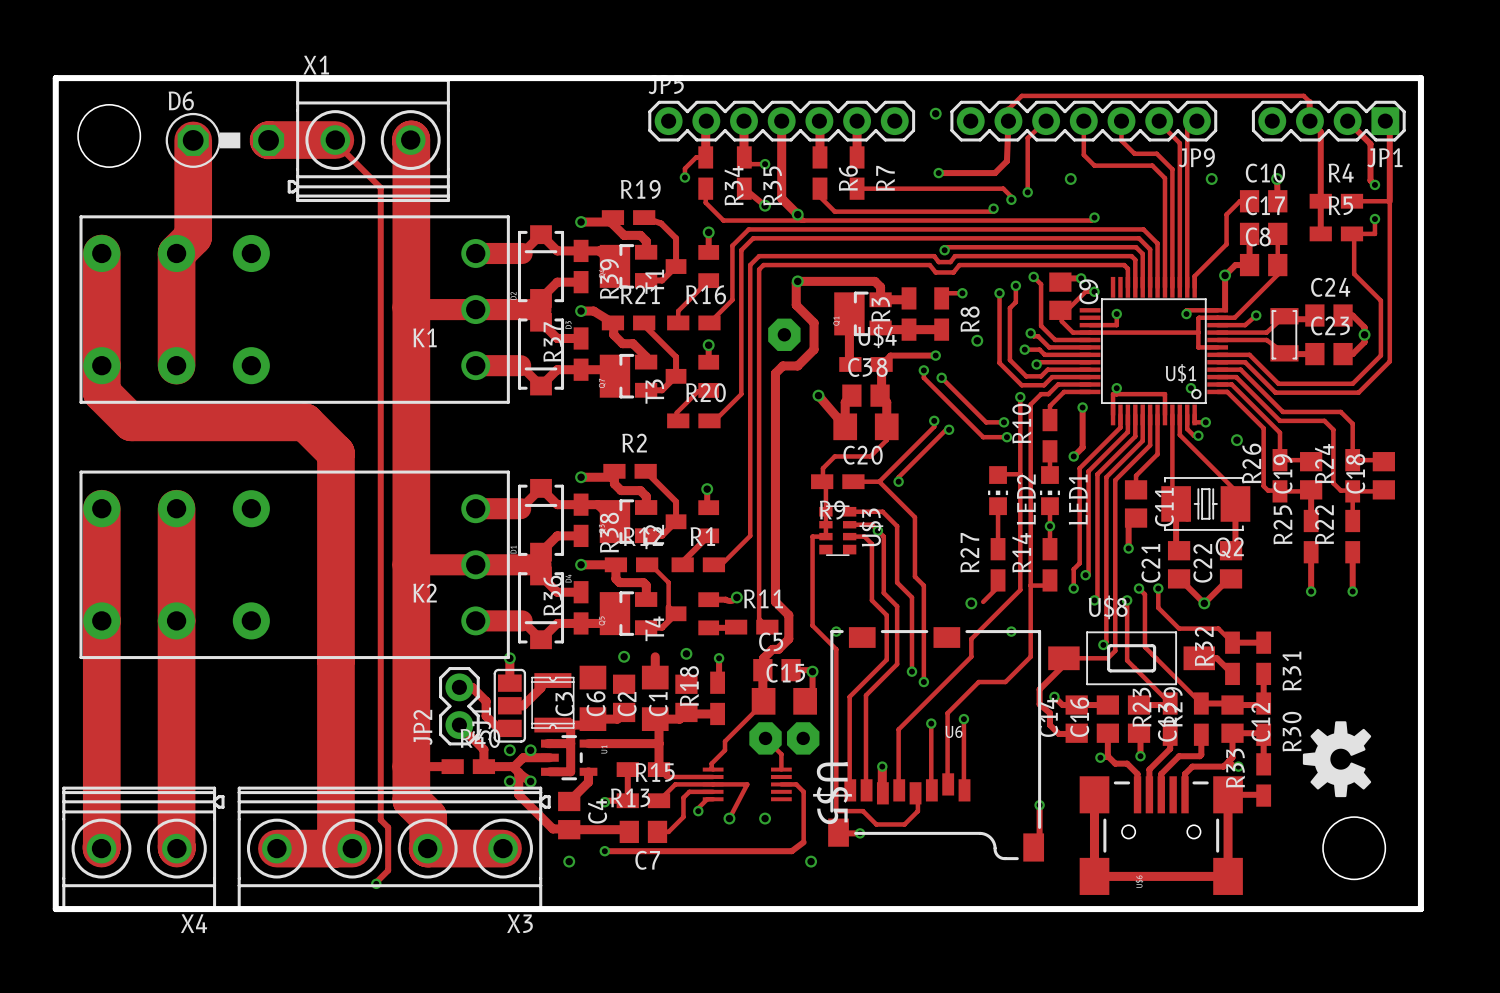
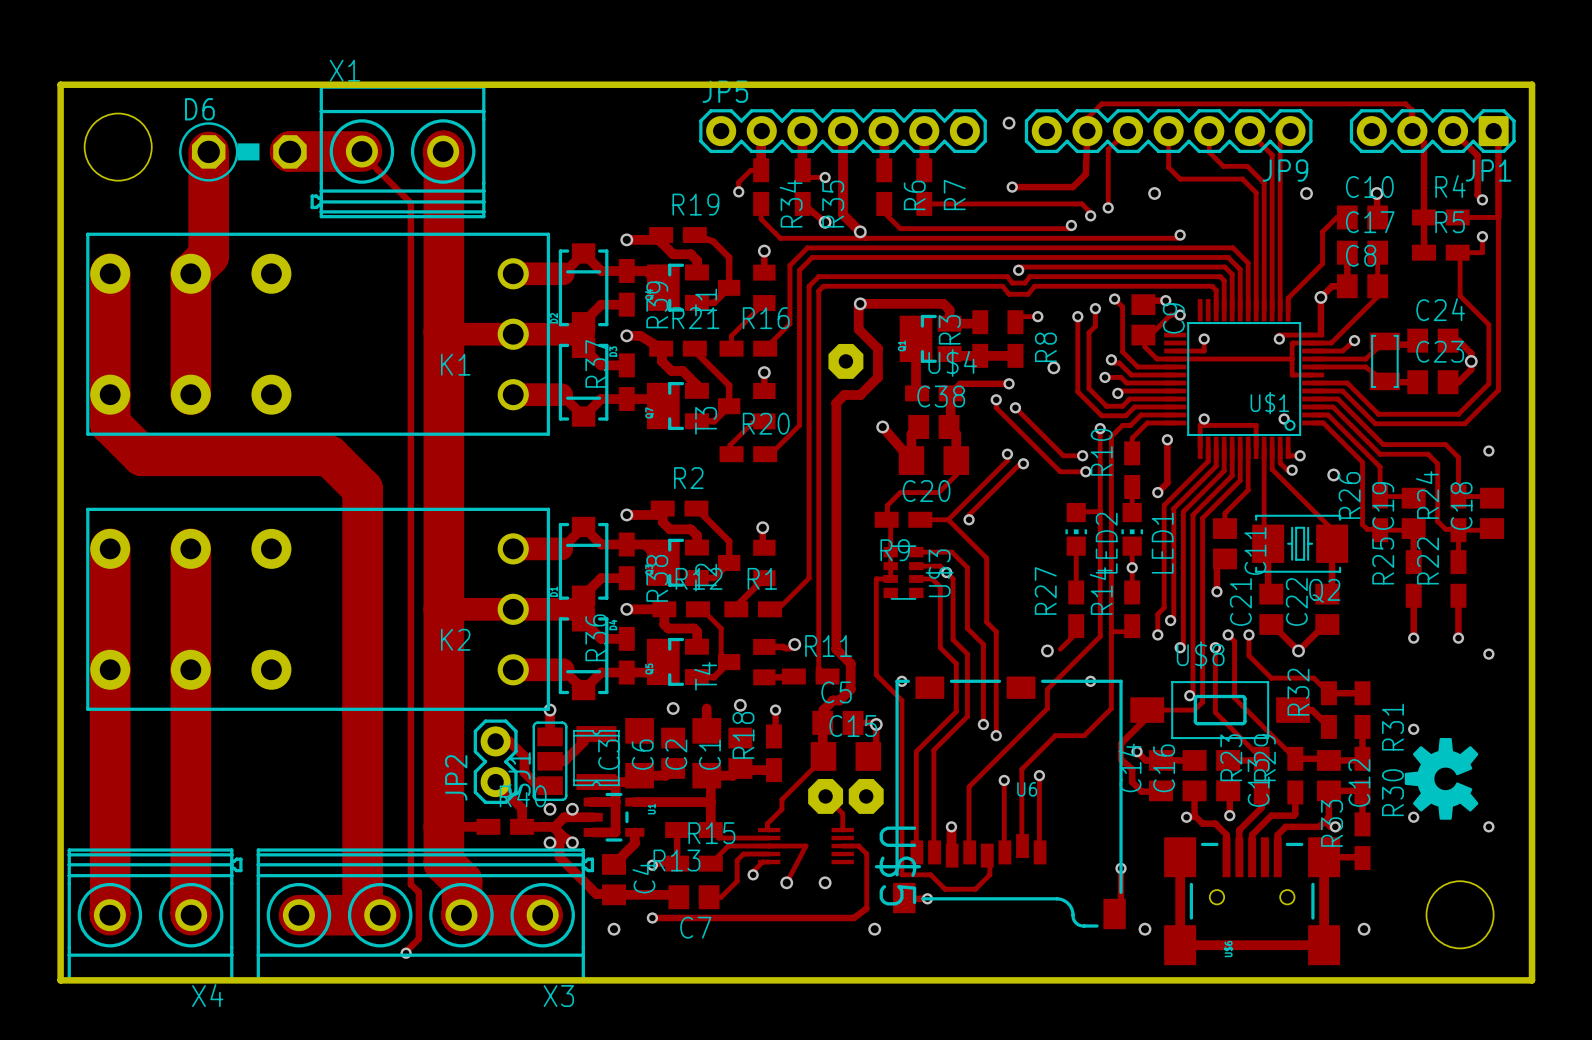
via: none -> (1488, 450)
via: none -> (1488, 654)
via: none -> (1413, 729)
via: none -> (1413, 817)
drawing position: (1337, 759) -> (1441, 778)
via: none -> (1488, 826)
via: none -> (1144, 929)
via: none -> (1364, 929)

